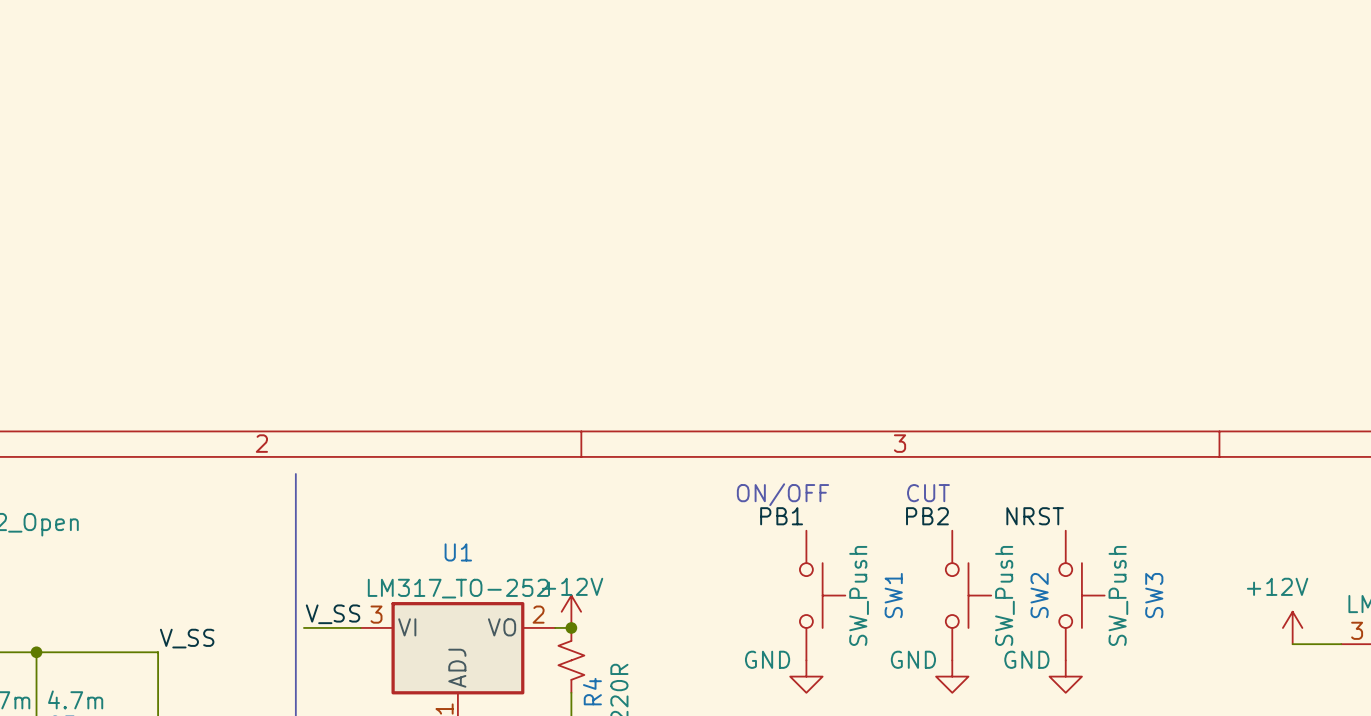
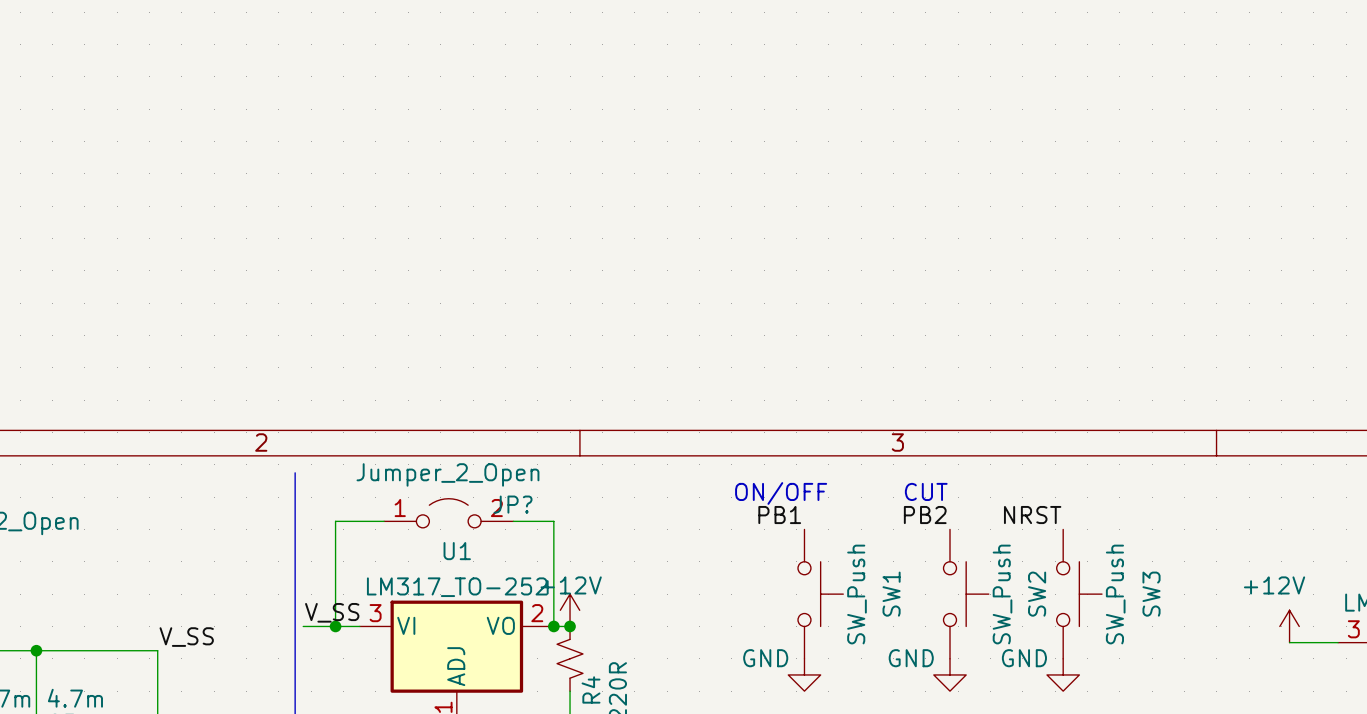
JP?: none -> Jumper_2_Open (448, 513)
wire: none -> (384, 521) (335, 521) (335, 626)
wire: none -> (513, 521) (553, 521) (553, 626)
junction: none -> (335, 626)
junction: none -> (553, 626)

